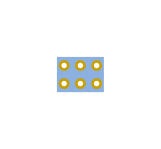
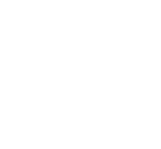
part: (80, 74) -> none

